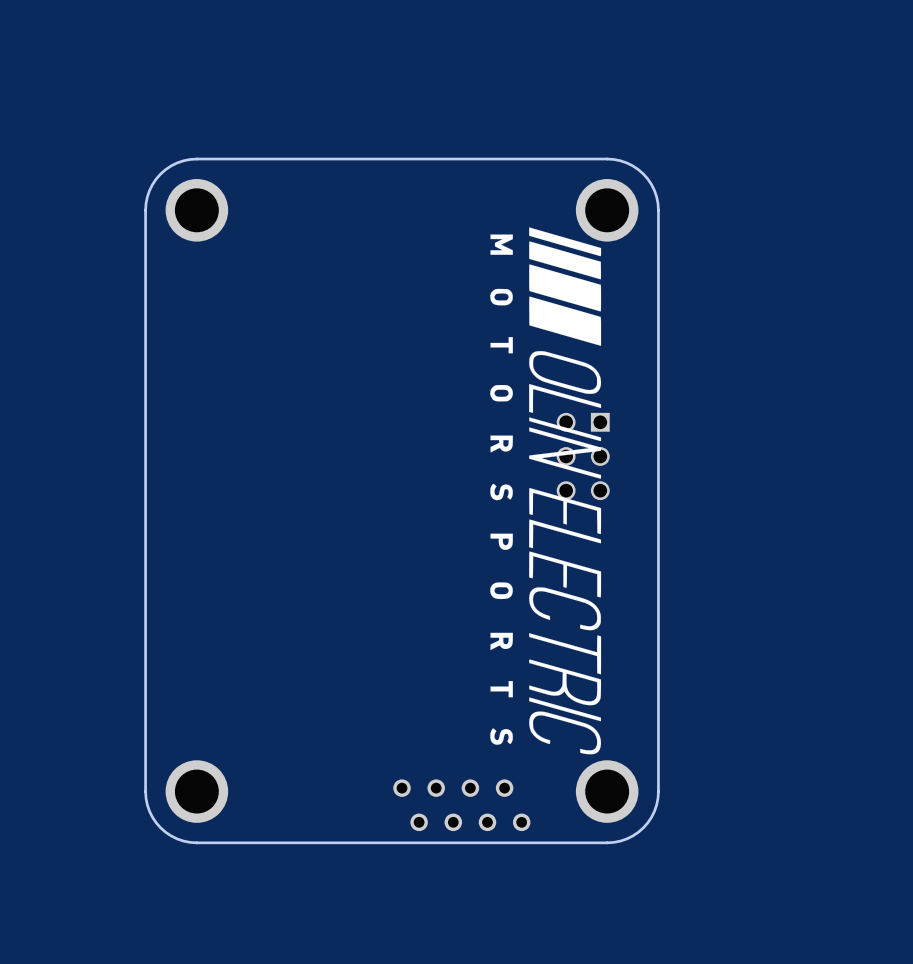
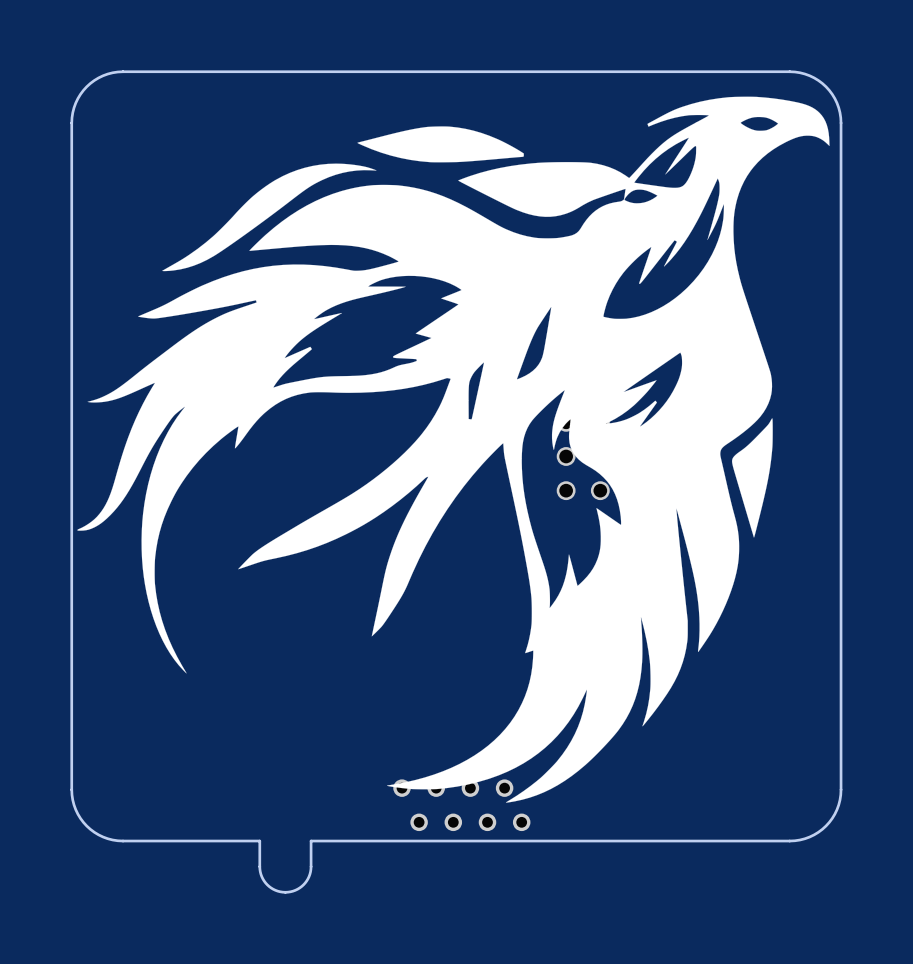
drawing: none -> [77, 96, 830, 803]
board edge: (607, 159) (196, 159) (183, 160) (171, 165) (160, 174) (152, 184) (147, 197) (145, 210) (145, 791) (147, 804) (152, 817) (160, 827) (171, 835) (183, 841) (196, 842) (607, 842) (620, 841) (632, 835) (643, 827) (651, 817) (656, 804) (658, 791) (658, 203) (654, 190) (643, 174) (626, 162) (607, 159) -> none
part: (196, 210) -> none
part: (607, 210) -> none
drawing: [490, 227, 602, 755] -> none
board edge: none -> (841, 789) (841, 123) (837, 103) (826, 86) (809, 75) (789, 71) (117, 71) (103, 75) (86, 86) (75, 103) (72, 117) (71, 789) (75, 809) (86, 826) (103, 837) (123, 841)
board edge: none -> (841, 789) (838, 804) (829, 822) (814, 834) (794, 840) (311, 841)
part: (196, 791) -> none
part: (607, 791) -> none
board edge: none -> (311, 841) (310, 869) (307, 878) (297, 889) (285, 892) (273, 889) (262, 878) (259, 869) (259, 841) (123, 841)

